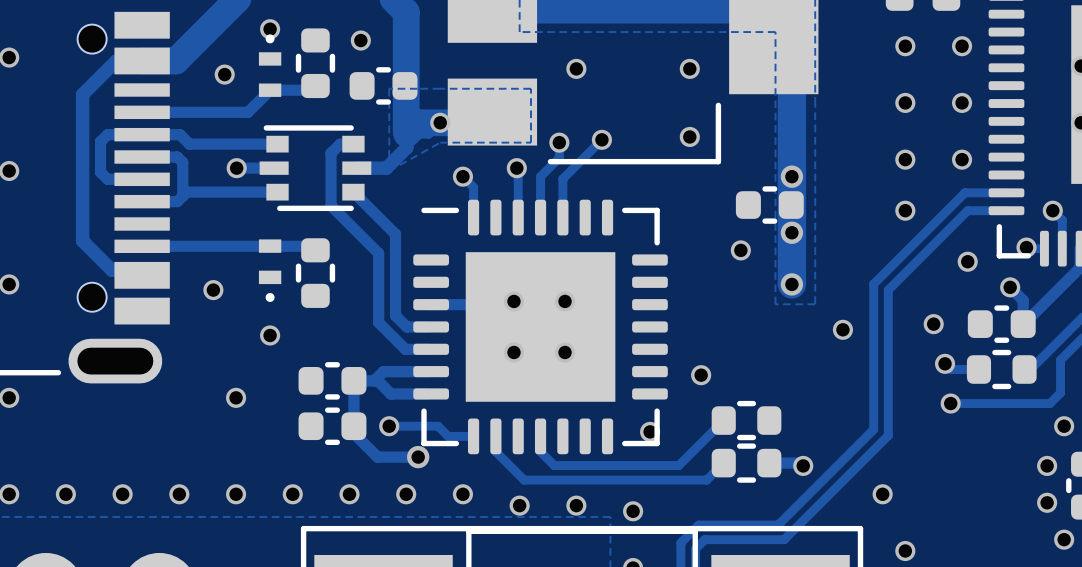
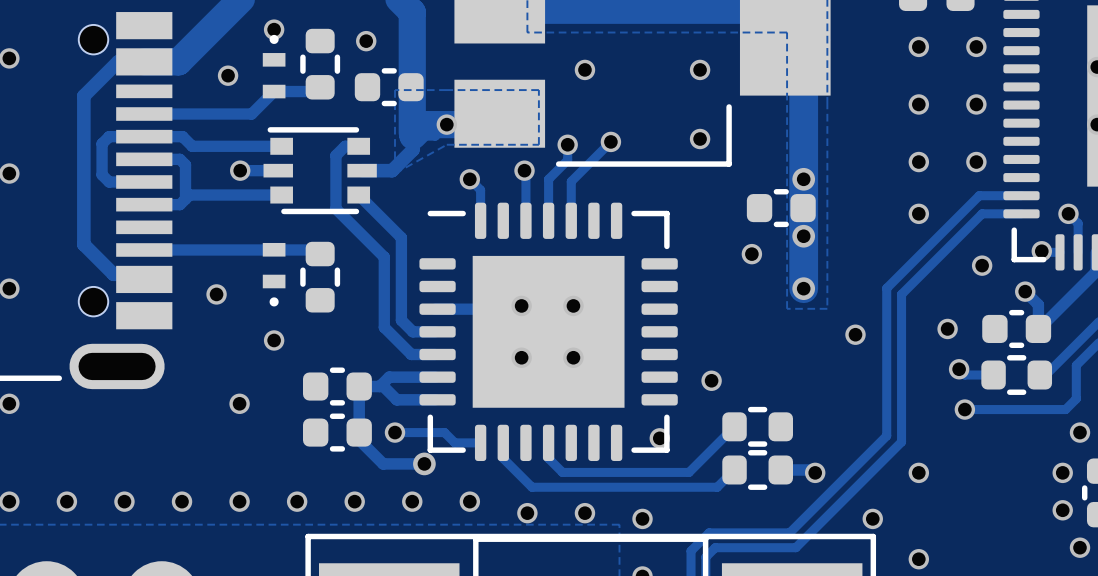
via: none -> (918, 472)
via: (882, 494) -> none
via: none -> (872, 518)

